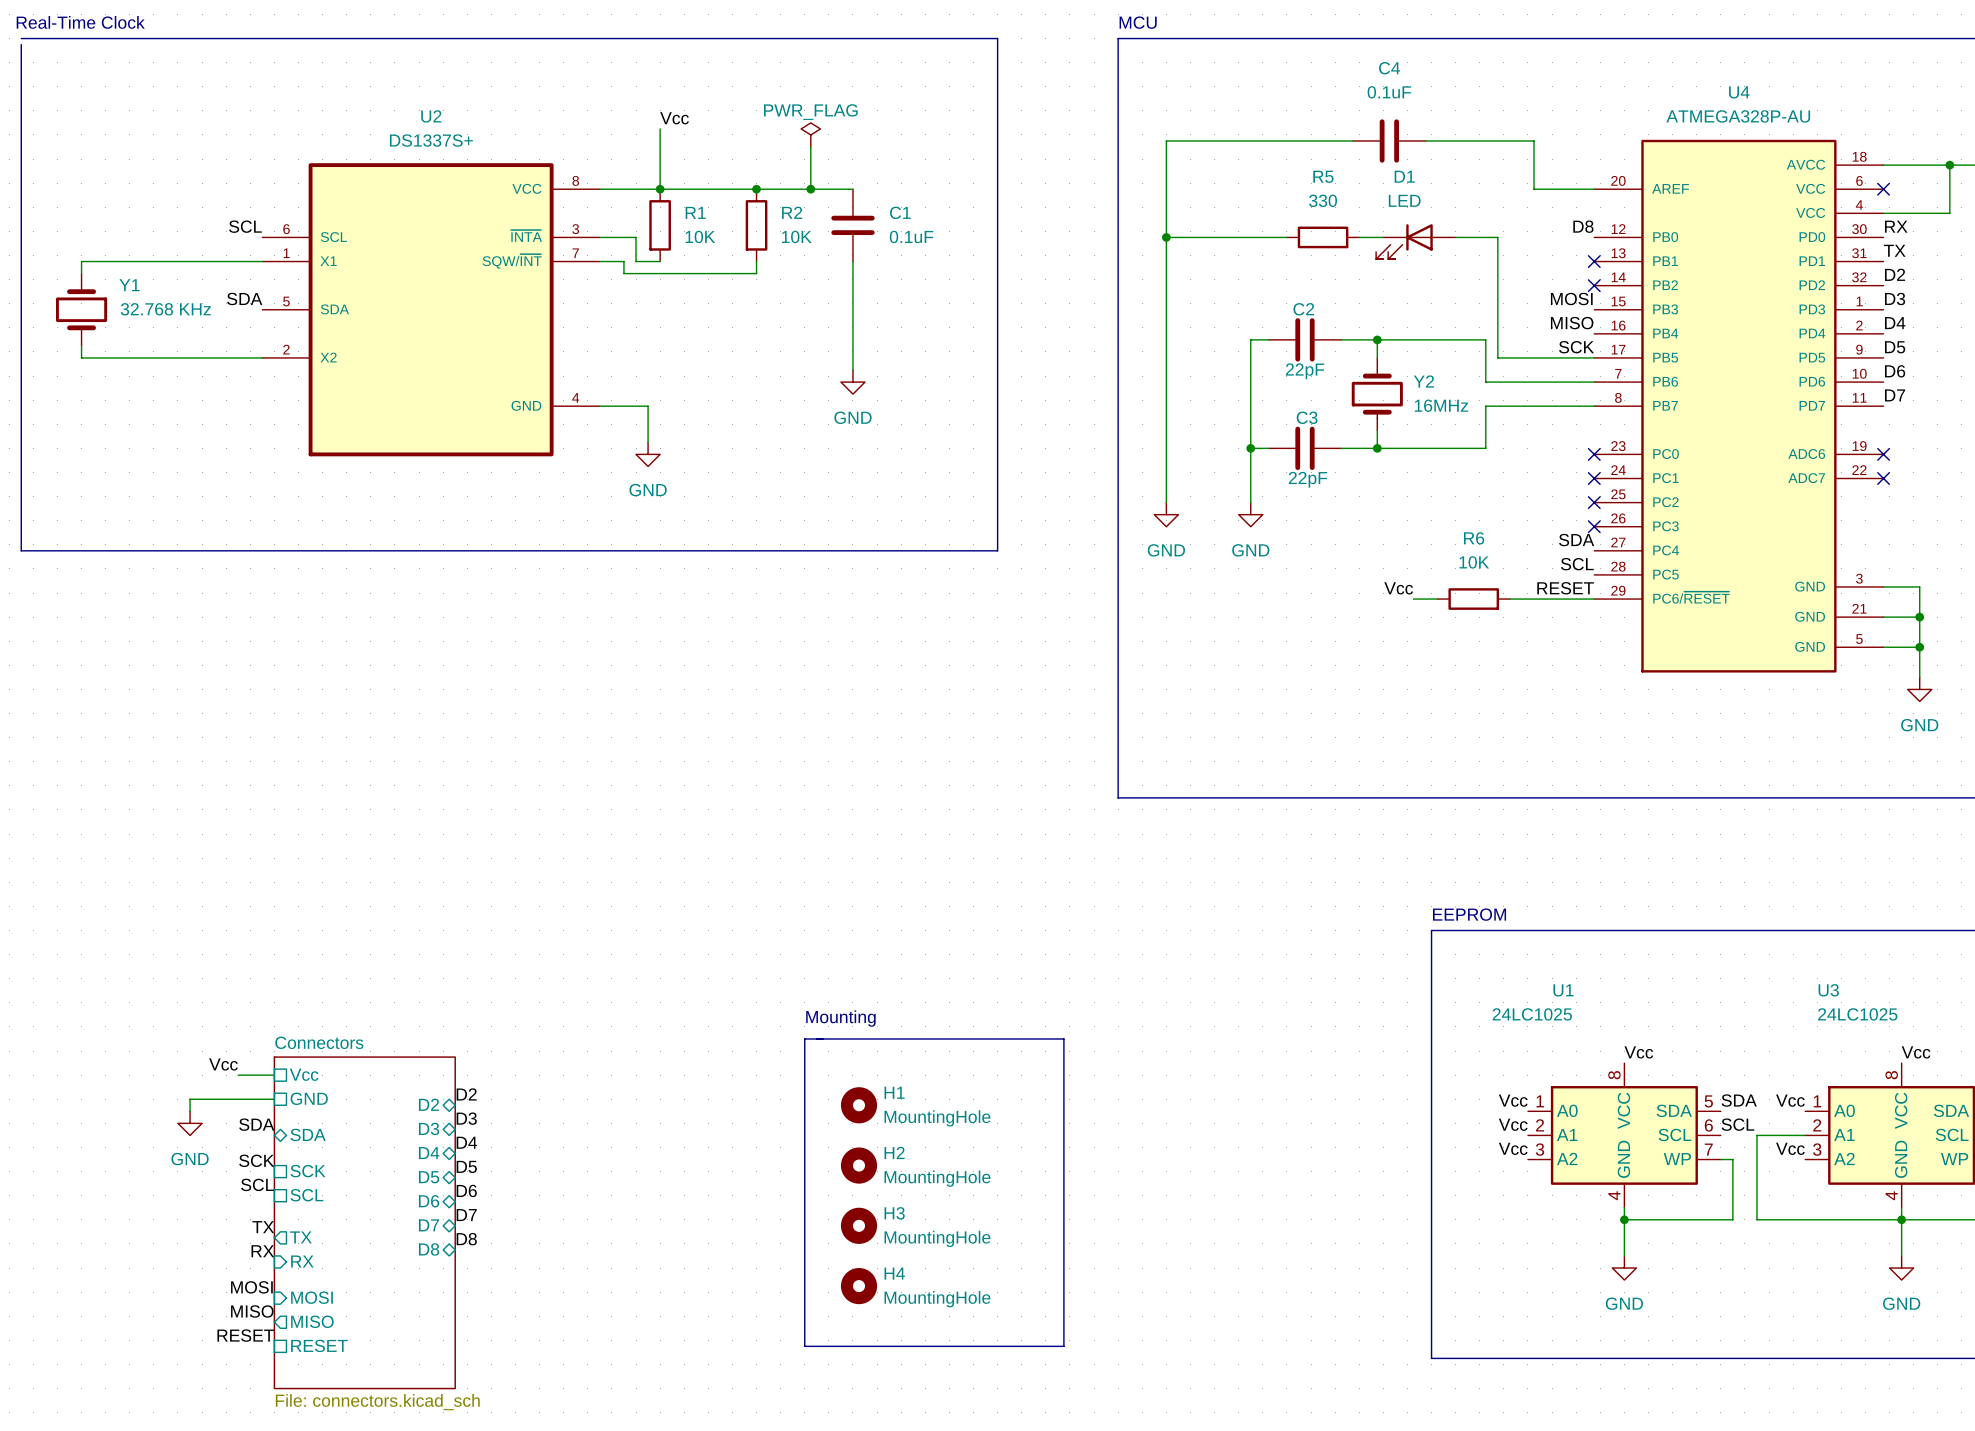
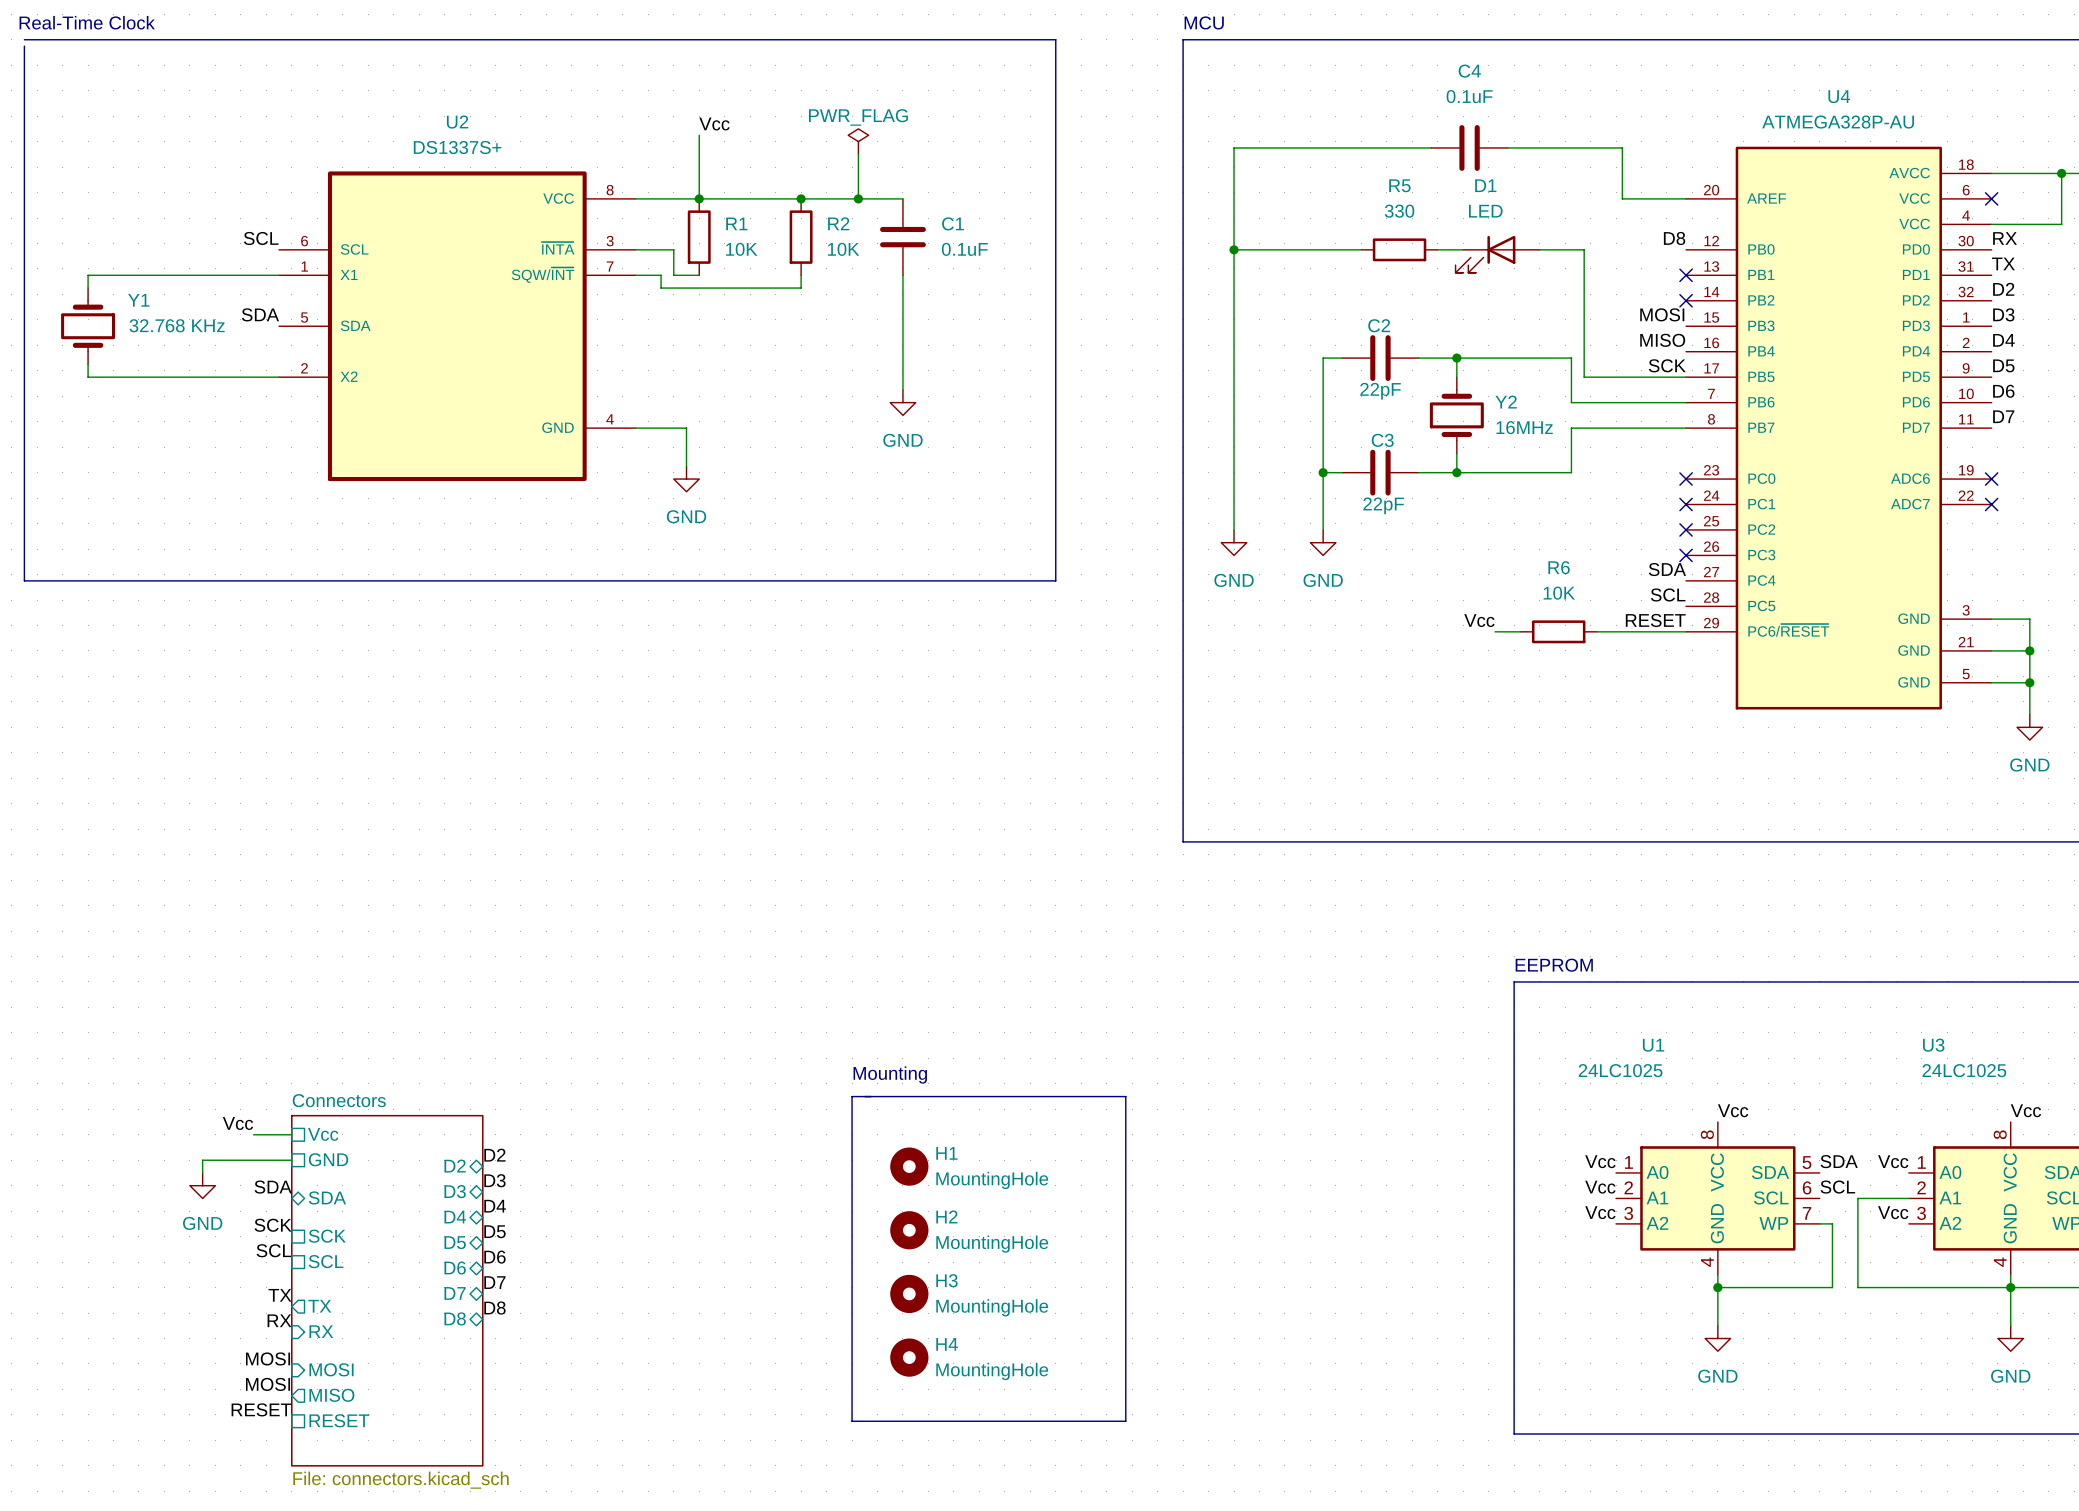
label: MISO (252, 1311) -> MOSI (268, 1384)

